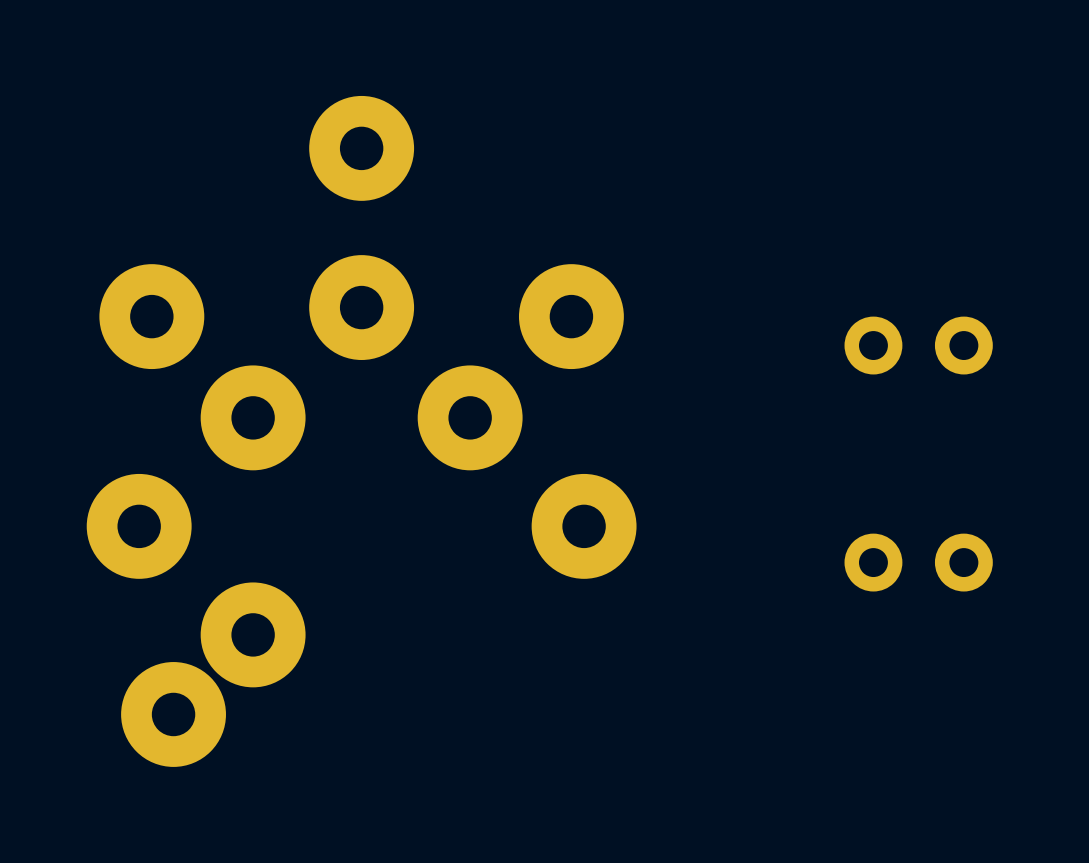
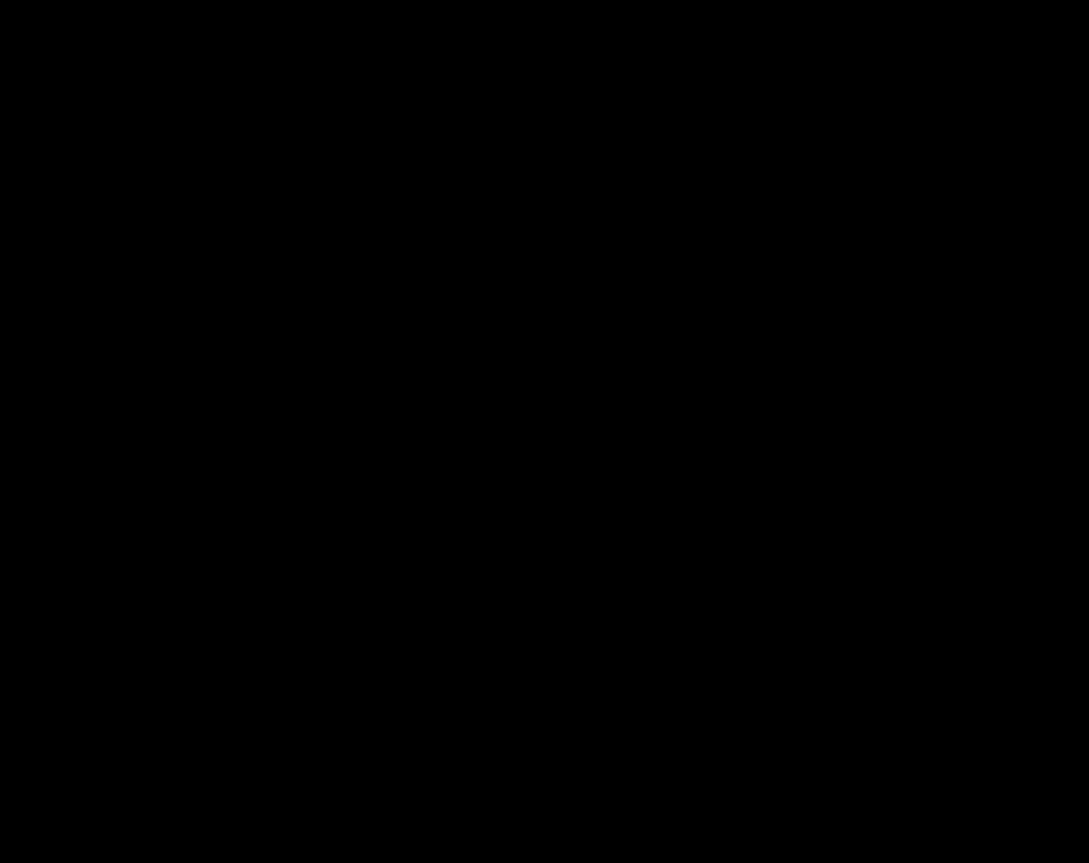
part: (918, 345) -> none
part: (361, 431) -> none
part: (918, 562) -> none

